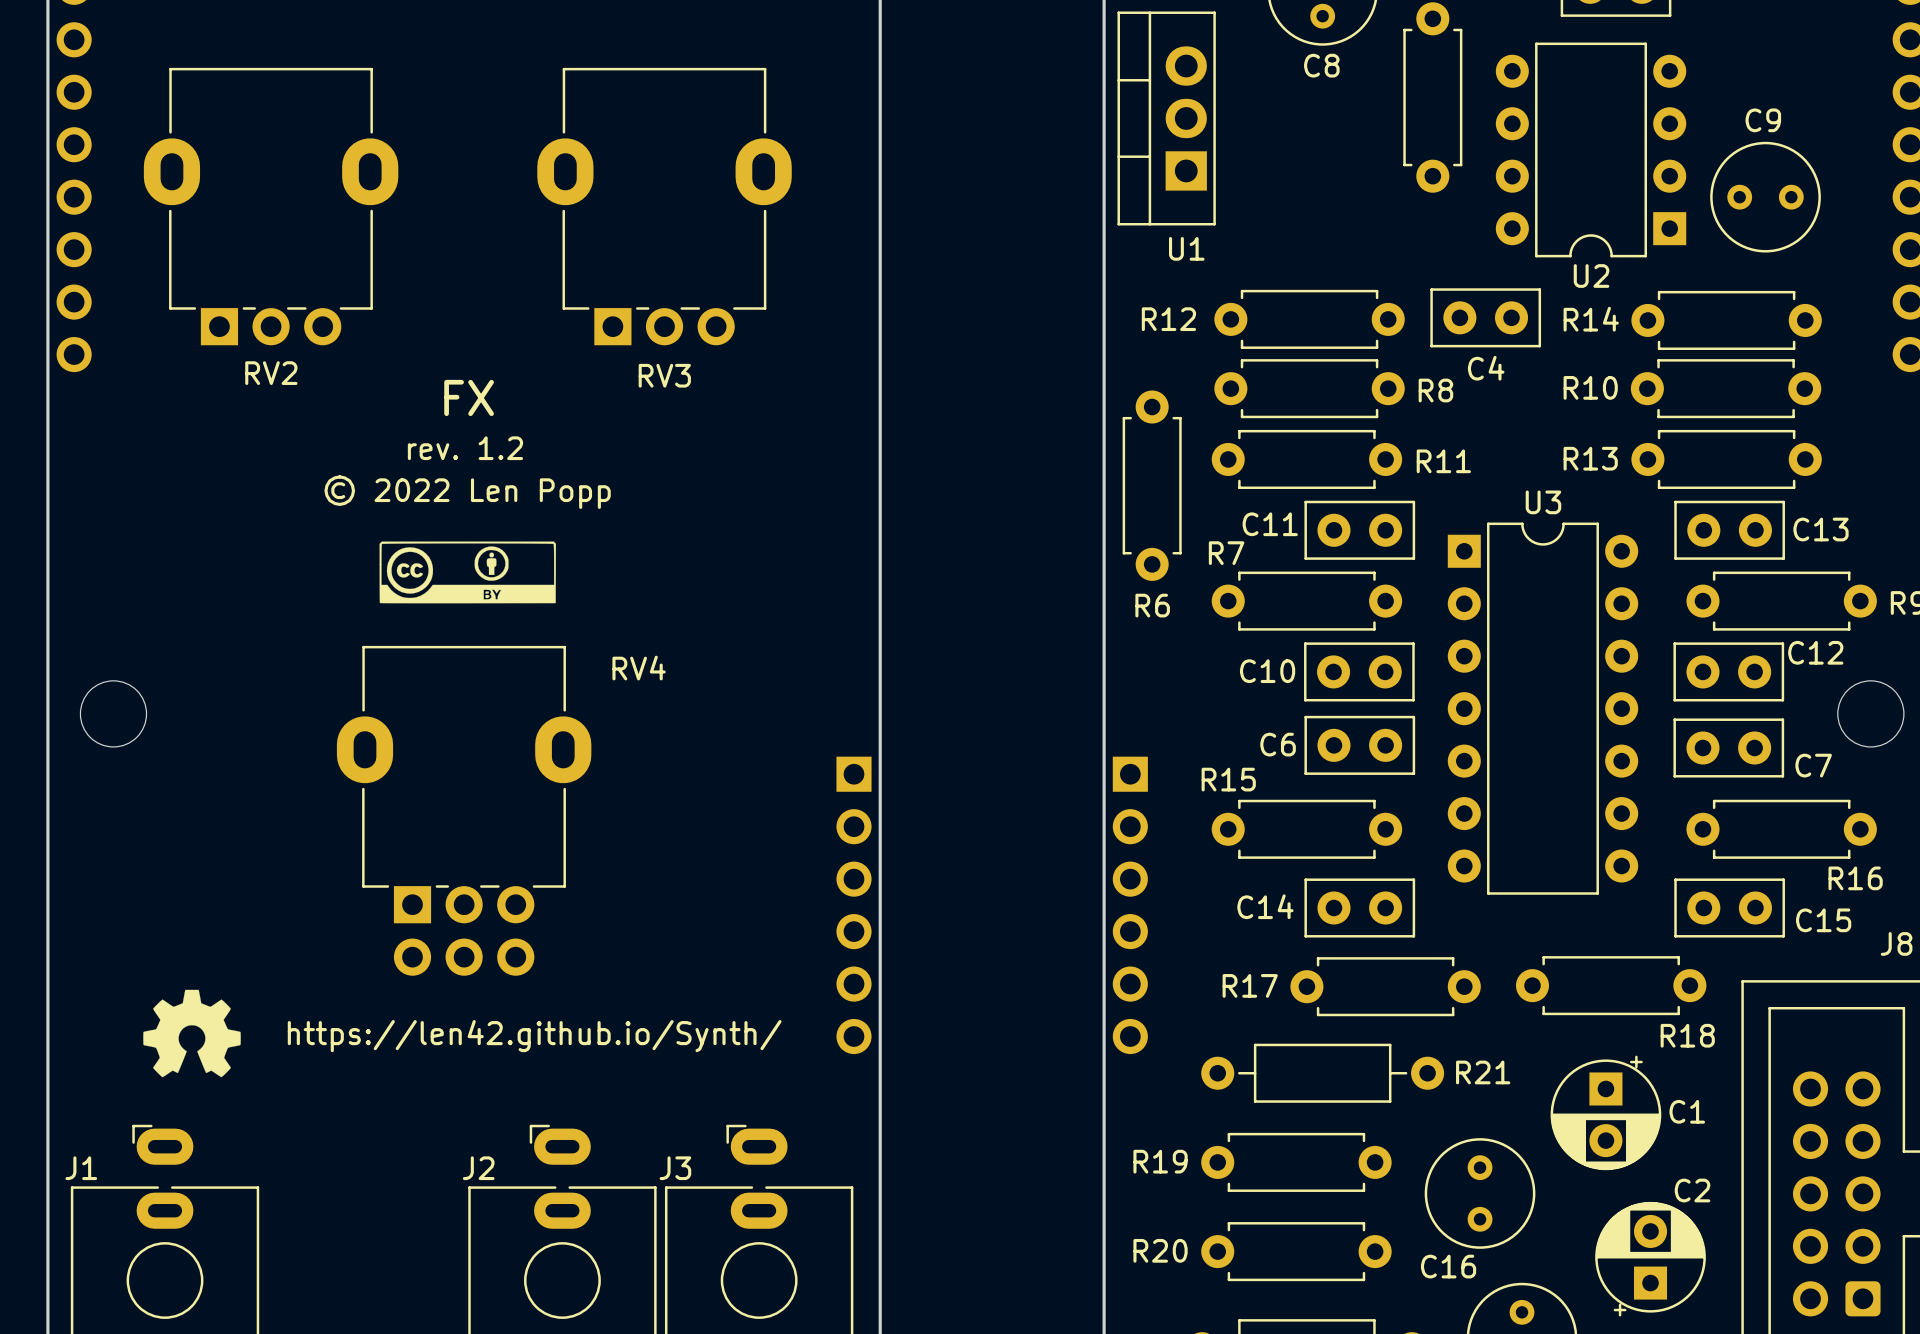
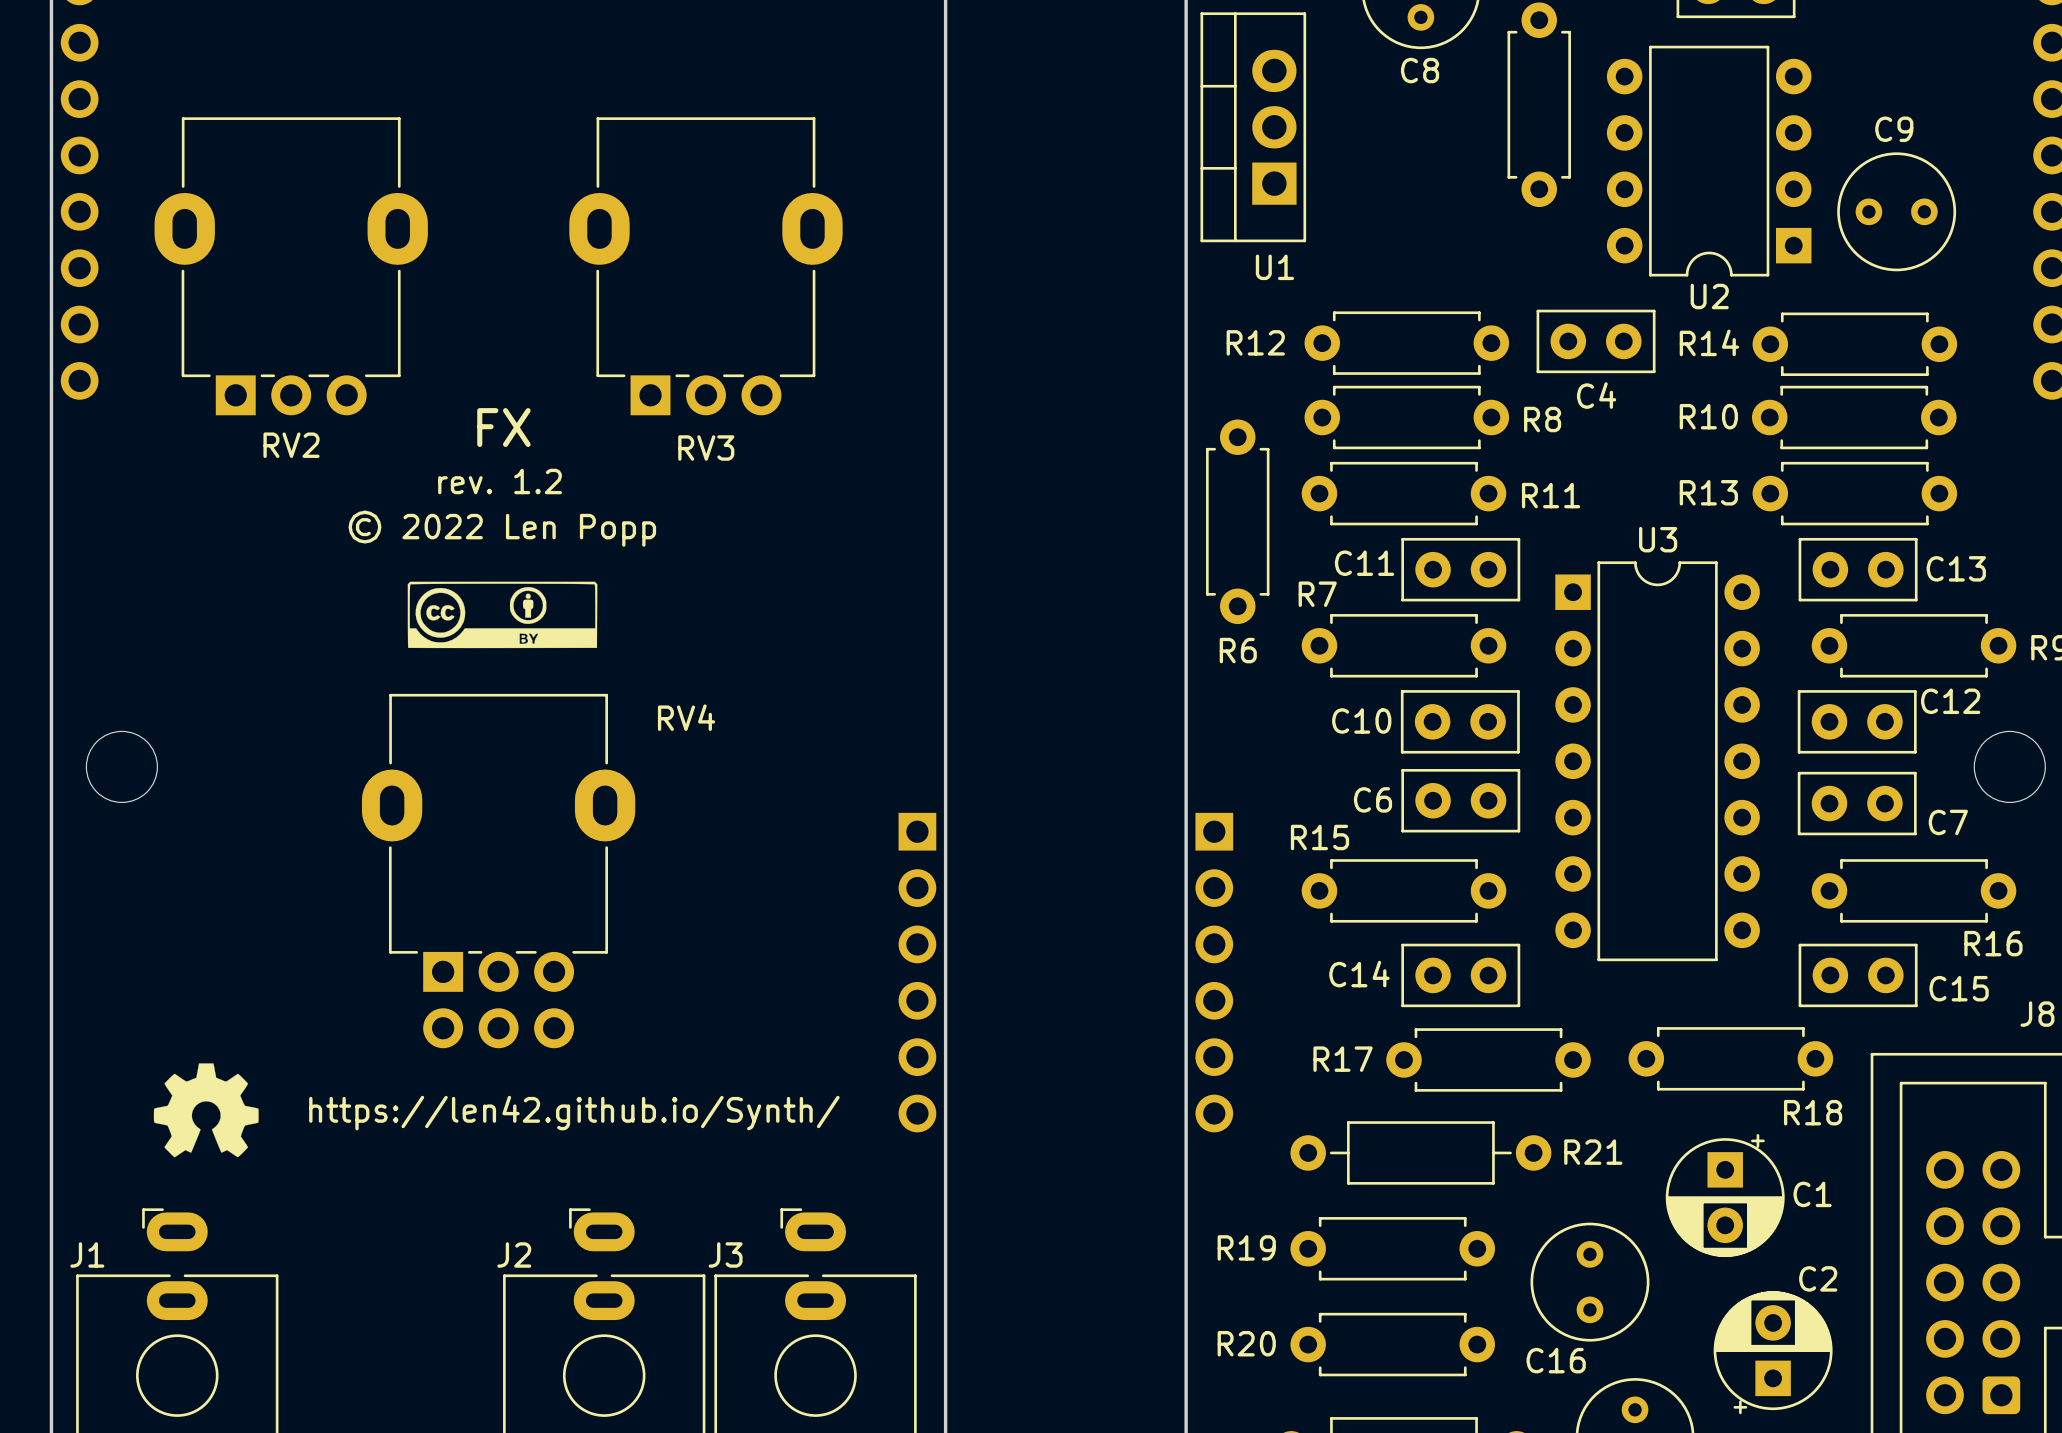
RV2 position: (271, 206) -> (291, 266)
RV3 position: (664, 206) -> (705, 266)

